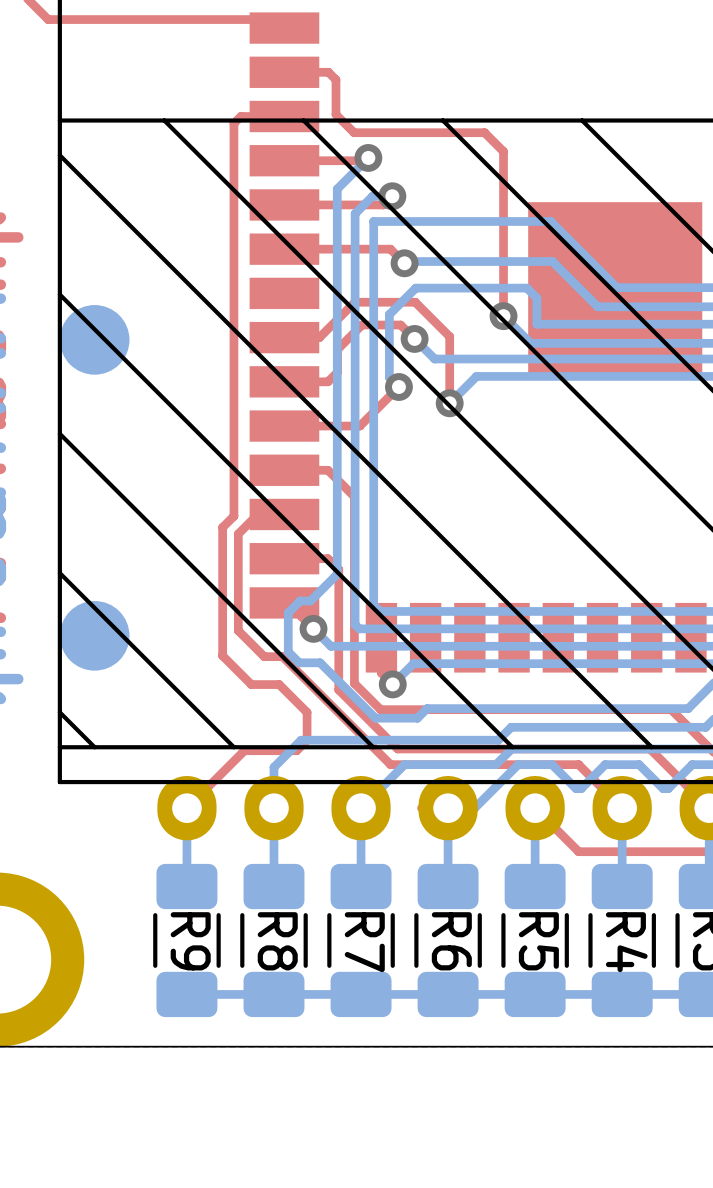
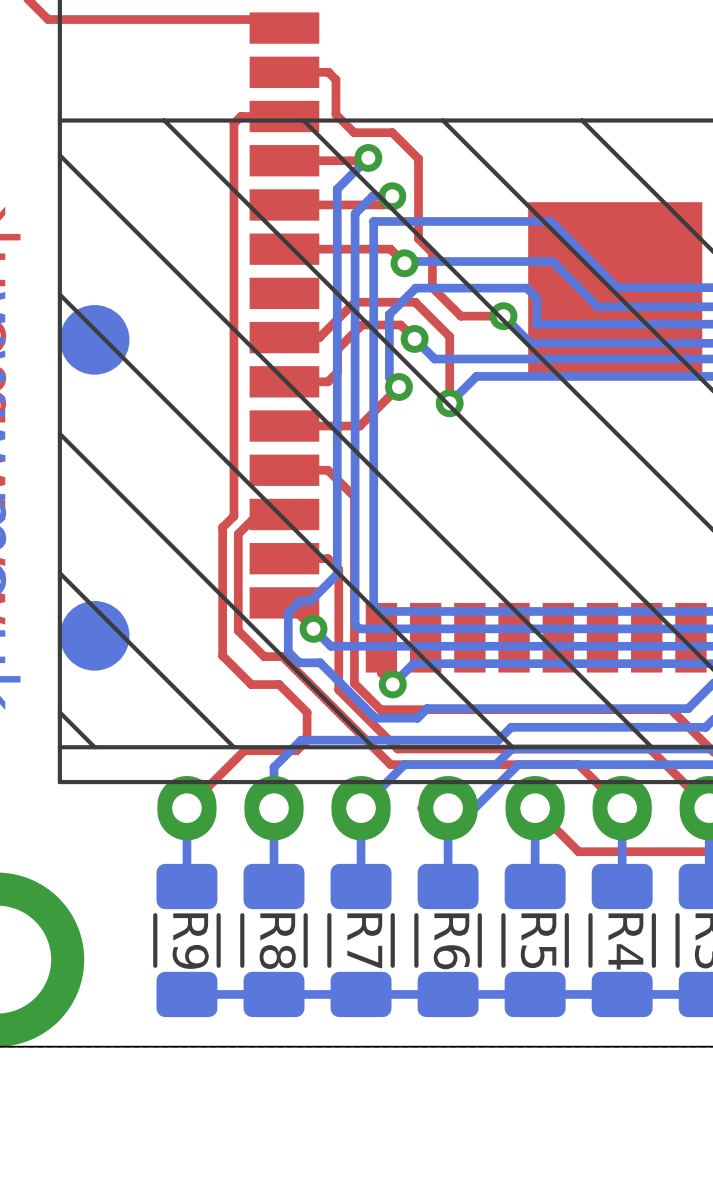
top track: (392, 132) (484, 132) (503, 151) (503, 316) -> (392, 132) (418, 158) (418, 238) (432, 252) (432, 287) (460, 316) (503, 316)
bottom track: (605, 764) (581, 788) (576, 788) (552, 764) -> (605, 764) (552, 764)
bottom track: (692, 764) (668, 788) (663, 788) (639, 764) -> (692, 764) (639, 764)

